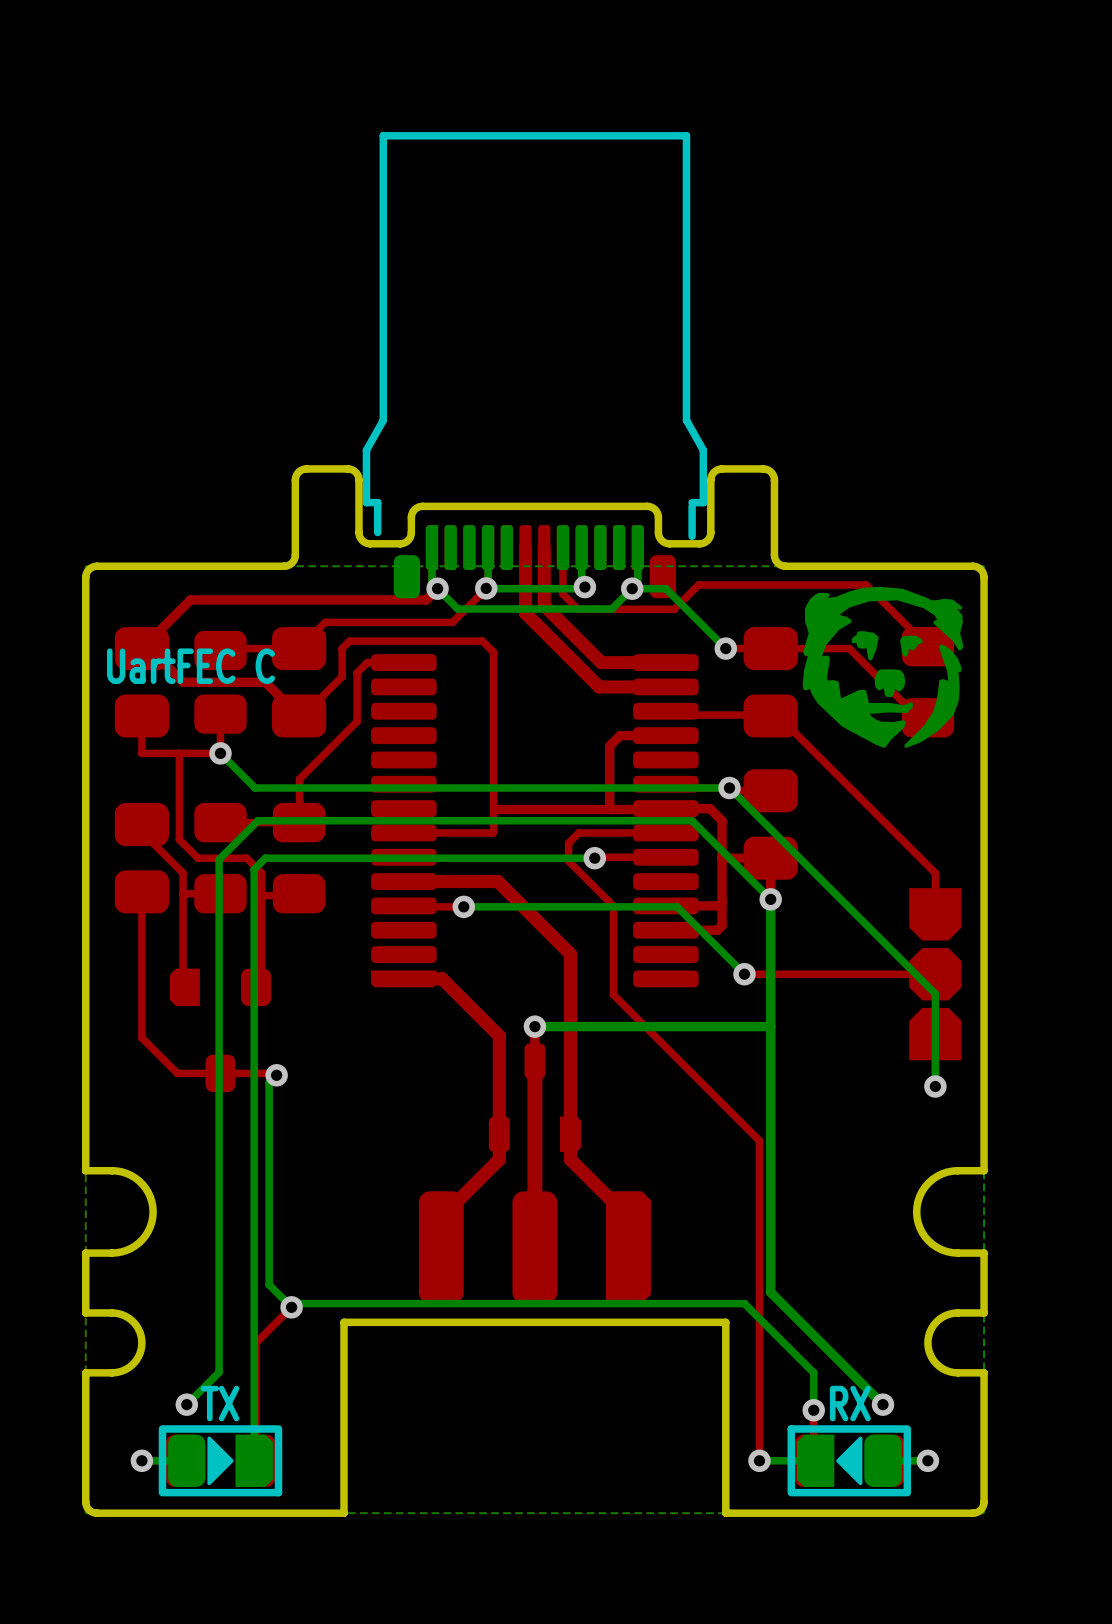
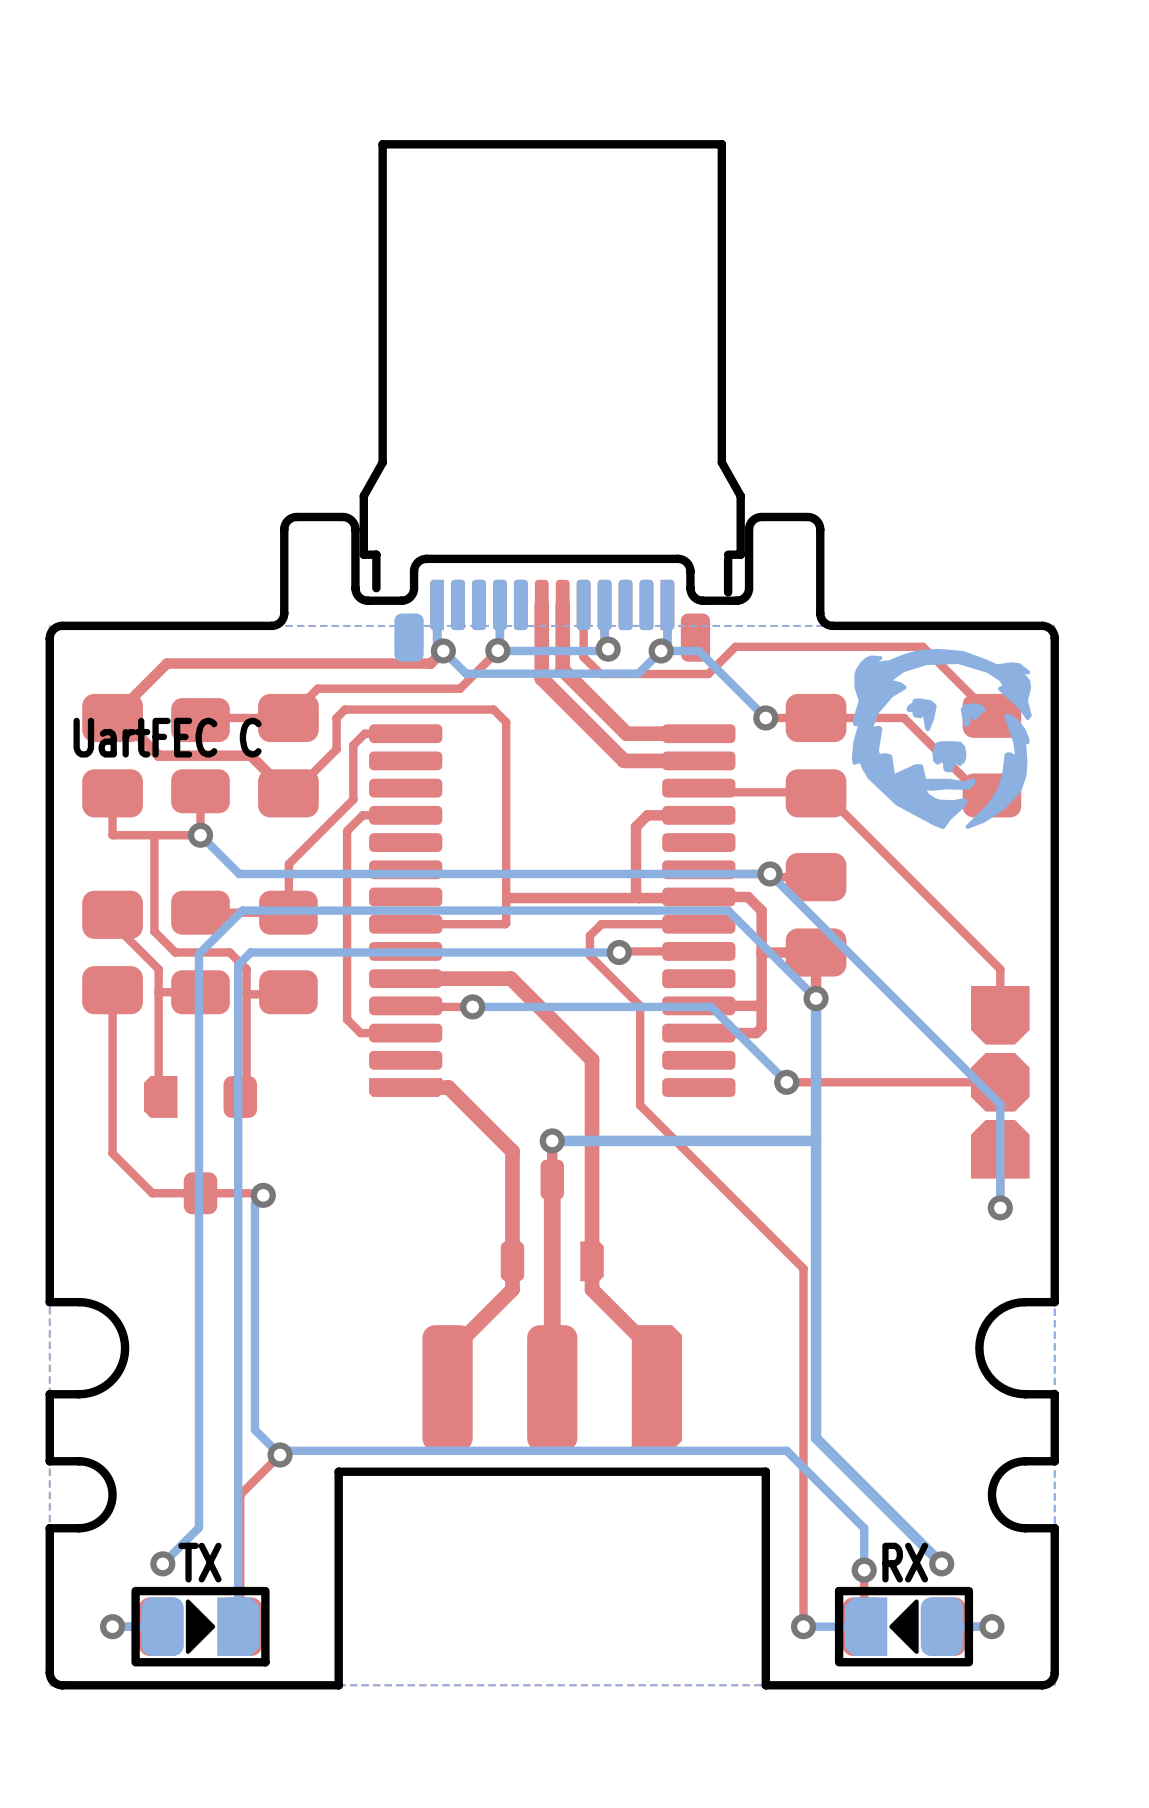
top track: none -> (405, 815) (362, 815) (347, 831) (347, 1019) (360, 1033) (405, 1033)

